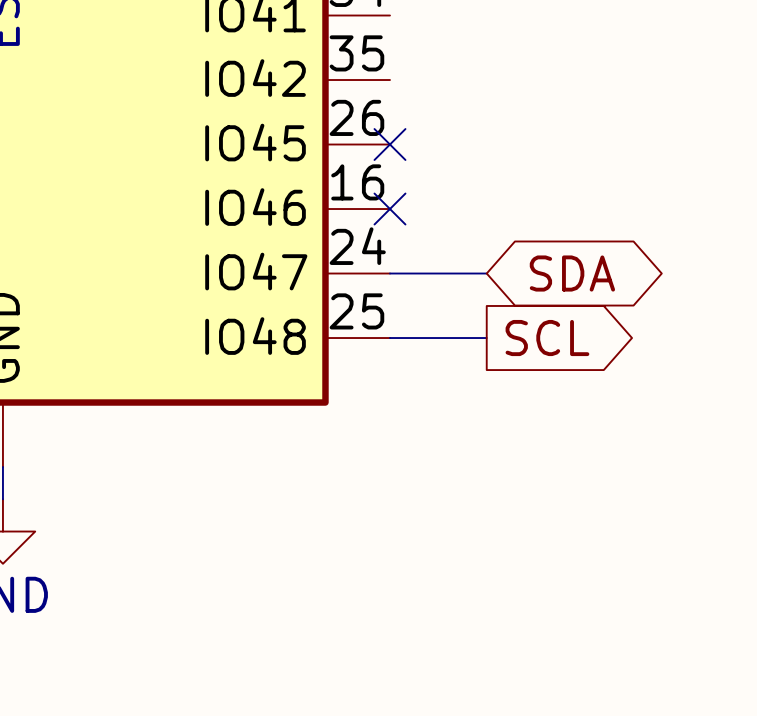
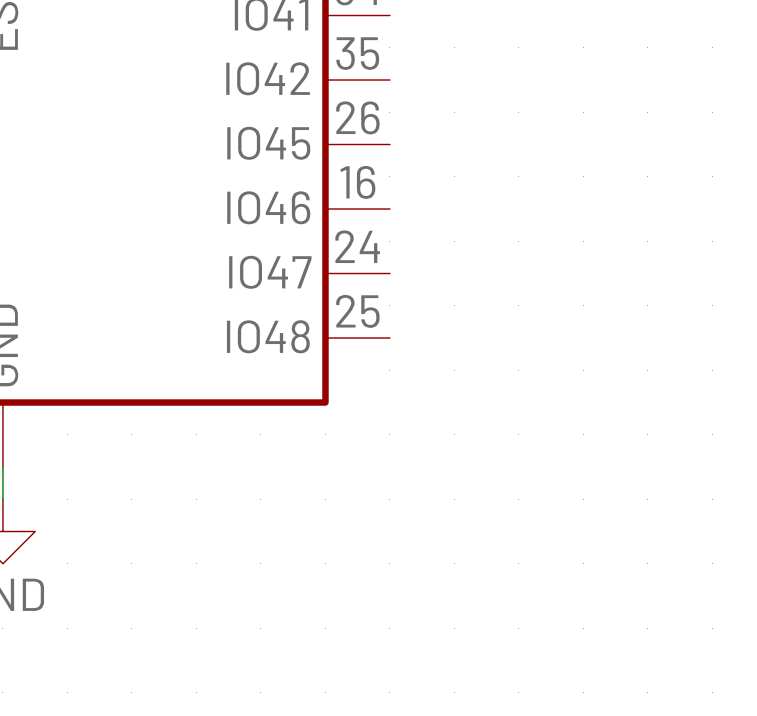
no-connect mark: (389, 144) -> none
no-connect mark: (389, 209) -> none
wire: (389, 273) (486, 273) -> none
global label: SDA (572, 273) -> none
wire: (389, 338) (486, 338) -> none
global label: SCL (547, 338) -> none

